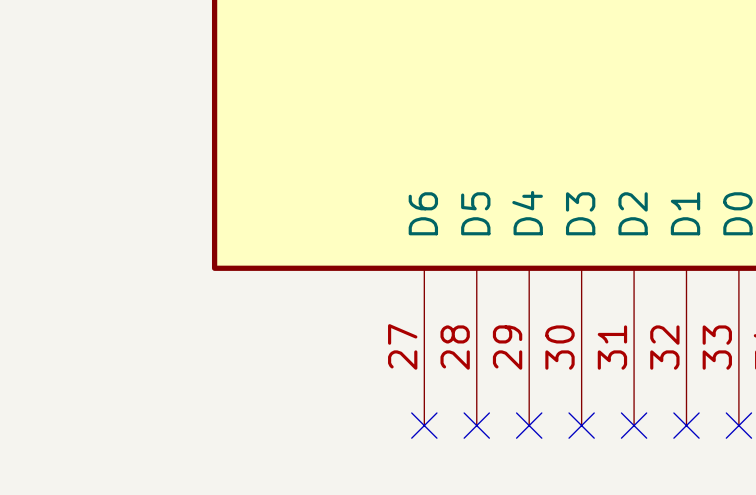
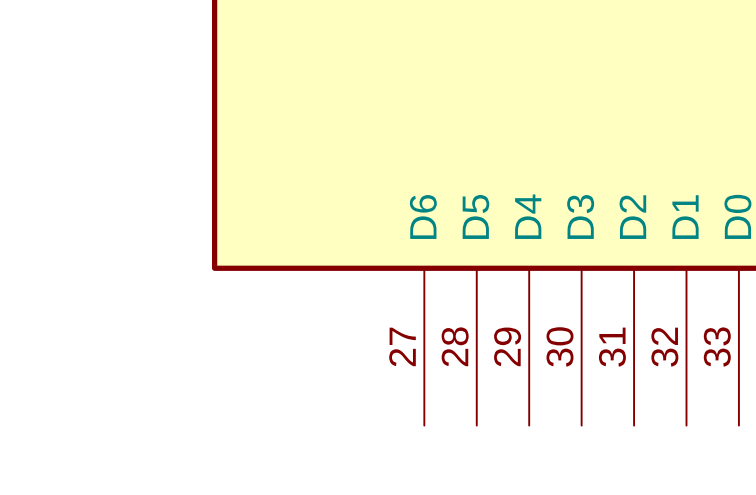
no-connect mark: (424, 425) -> none
no-connect mark: (476, 425) -> none
no-connect mark: (529, 425) -> none
no-connect mark: (581, 425) -> none
no-connect mark: (634, 425) -> none
no-connect mark: (686, 425) -> none
no-connect mark: (738, 425) -> none

